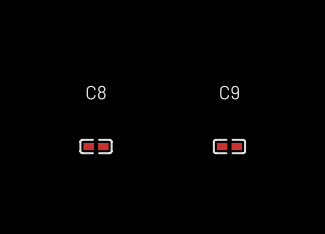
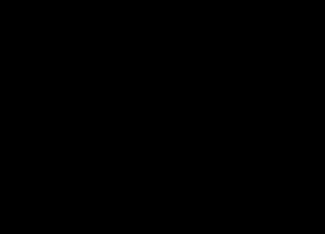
C8: (96, 146) -> none
C9: (229, 146) -> none

